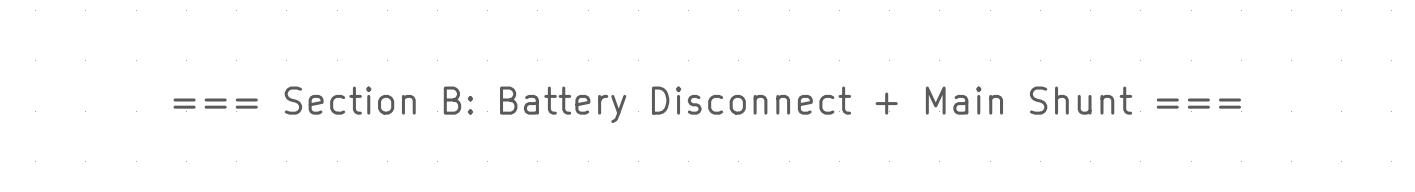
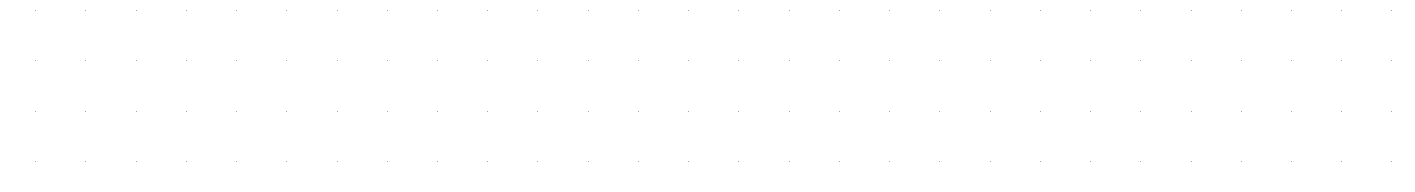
text: === Section B: Battery Disconnect + Main Shunt === (707, 104) -> none

